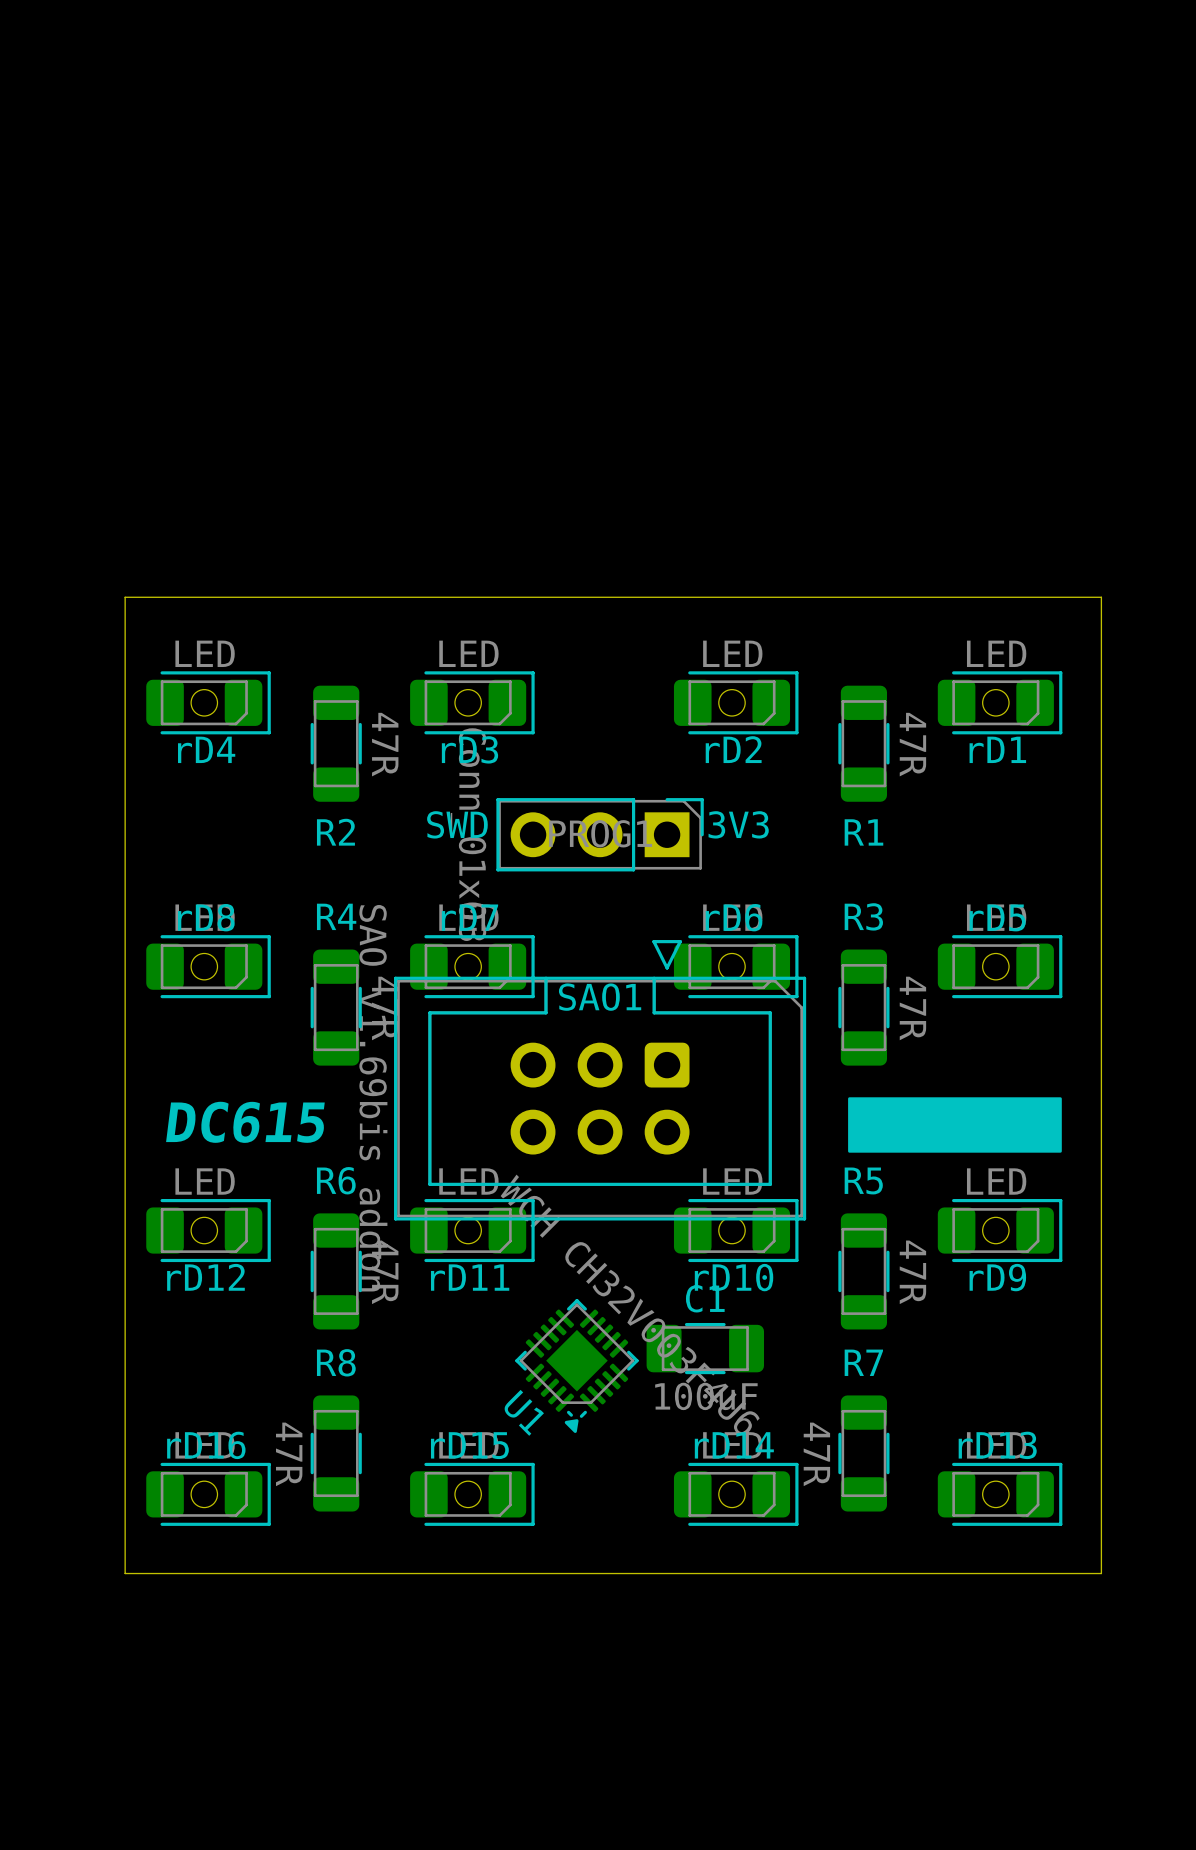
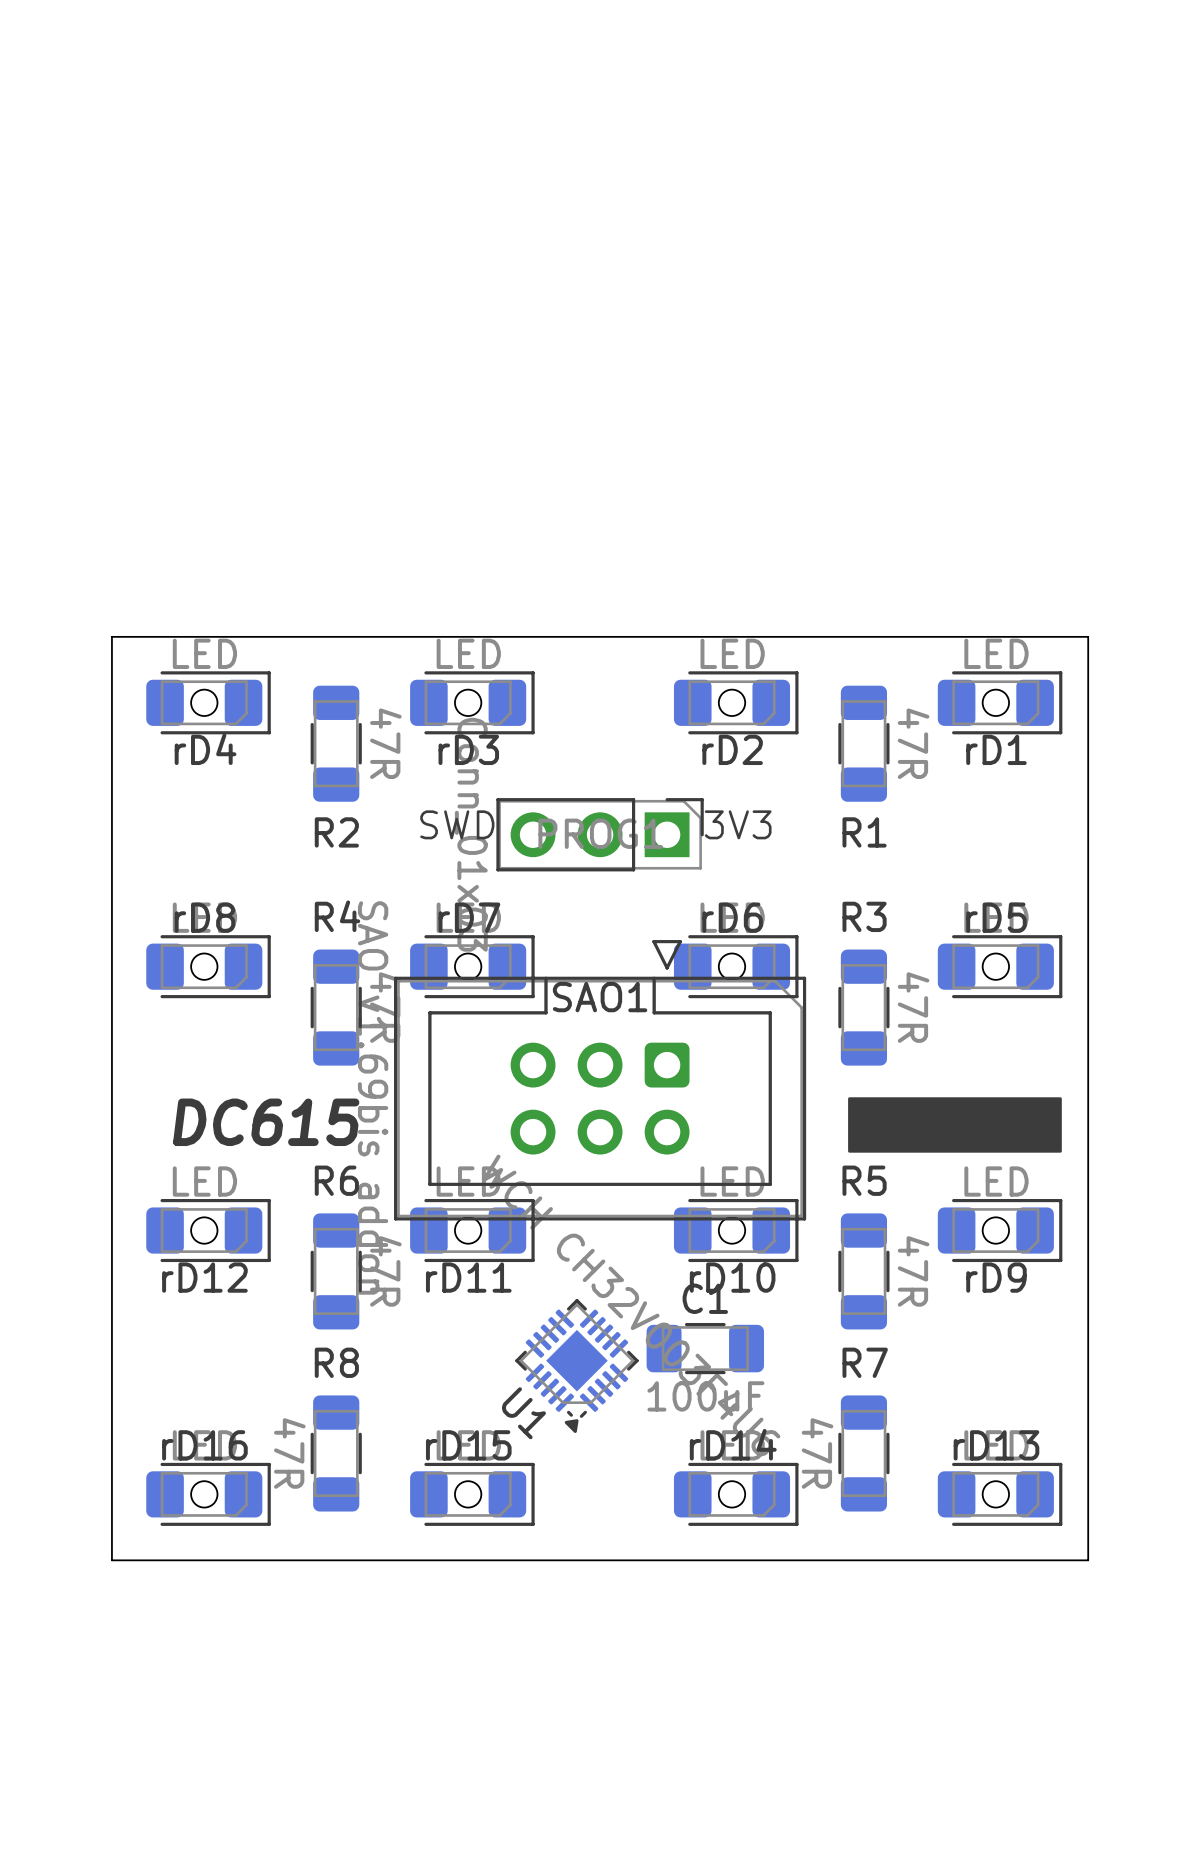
board edge: (1101, 597) (125, 597) (125, 1573) (1101, 1573) (1101, 597) -> (1088, 636) (1088, 1560) (111, 1560) (111, 636) (1088, 636)

